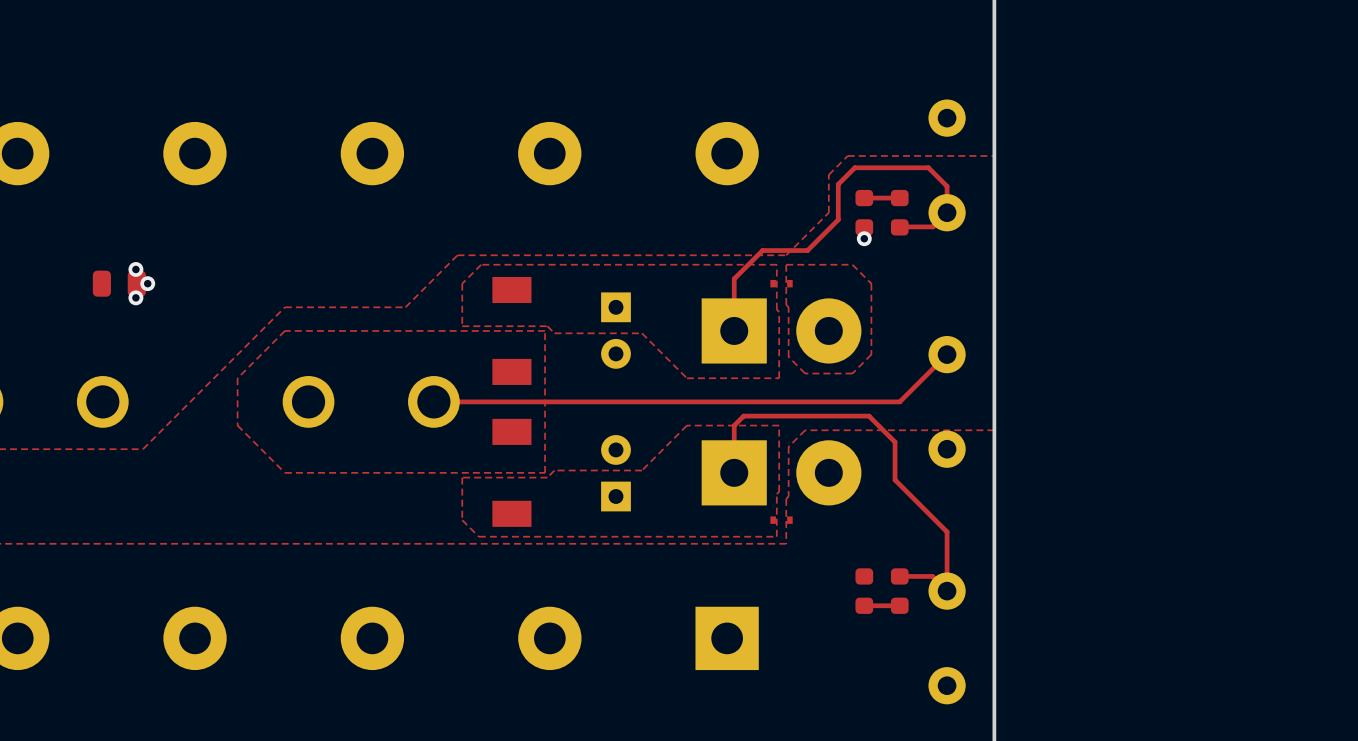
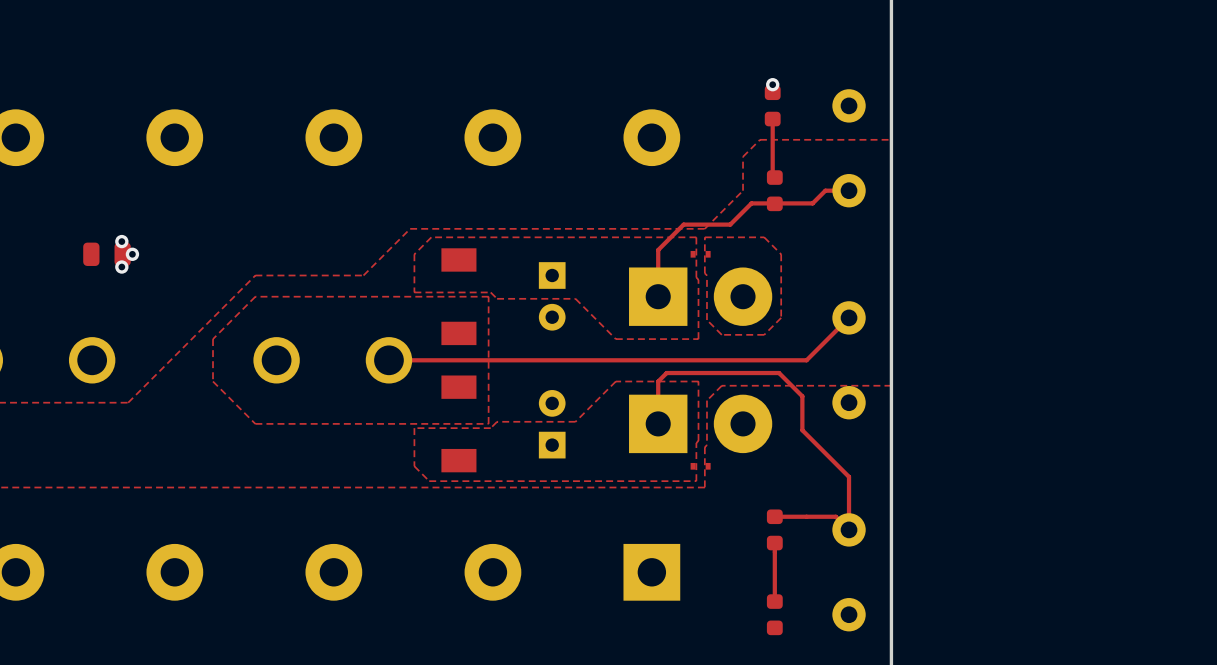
via: none -> (772, 84)
top track: none -> (772, 119) (772, 177)
top track: (899, 198) (864, 198) -> (806, 516) (774, 517)
part position: (899, 212) -> (772, 105)
top track: none -> (849, 190) (825, 190) (812, 203)
top track: (906, 226) (932, 226) (947, 212) (947, 186) (928, 167) (854, 167) (838, 184) (838, 219) (807, 250) -> (806, 203) (751, 203) (730, 224) (723, 224)
via: (864, 238) -> none
part position: (899, 591) -> (774, 614)
top track: (864, 605) (899, 605) -> (774, 543) (774, 601)

